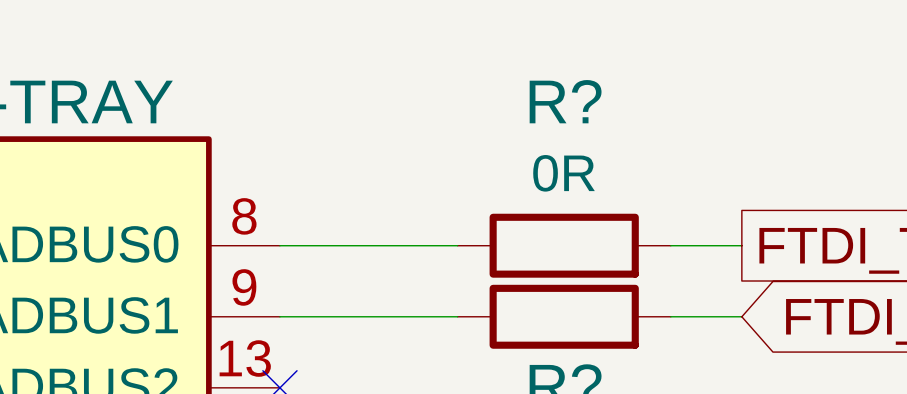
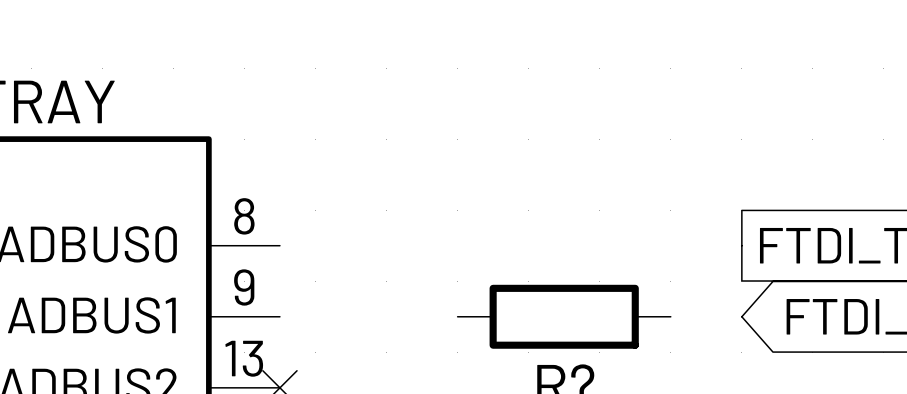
wire: (279, 245) (457, 245) -> none
R?: (564, 245) -> none
wire: (670, 245) (741, 245) -> none
wire: (279, 316) (457, 316) -> none
wire: (670, 316) (741, 316) -> none

